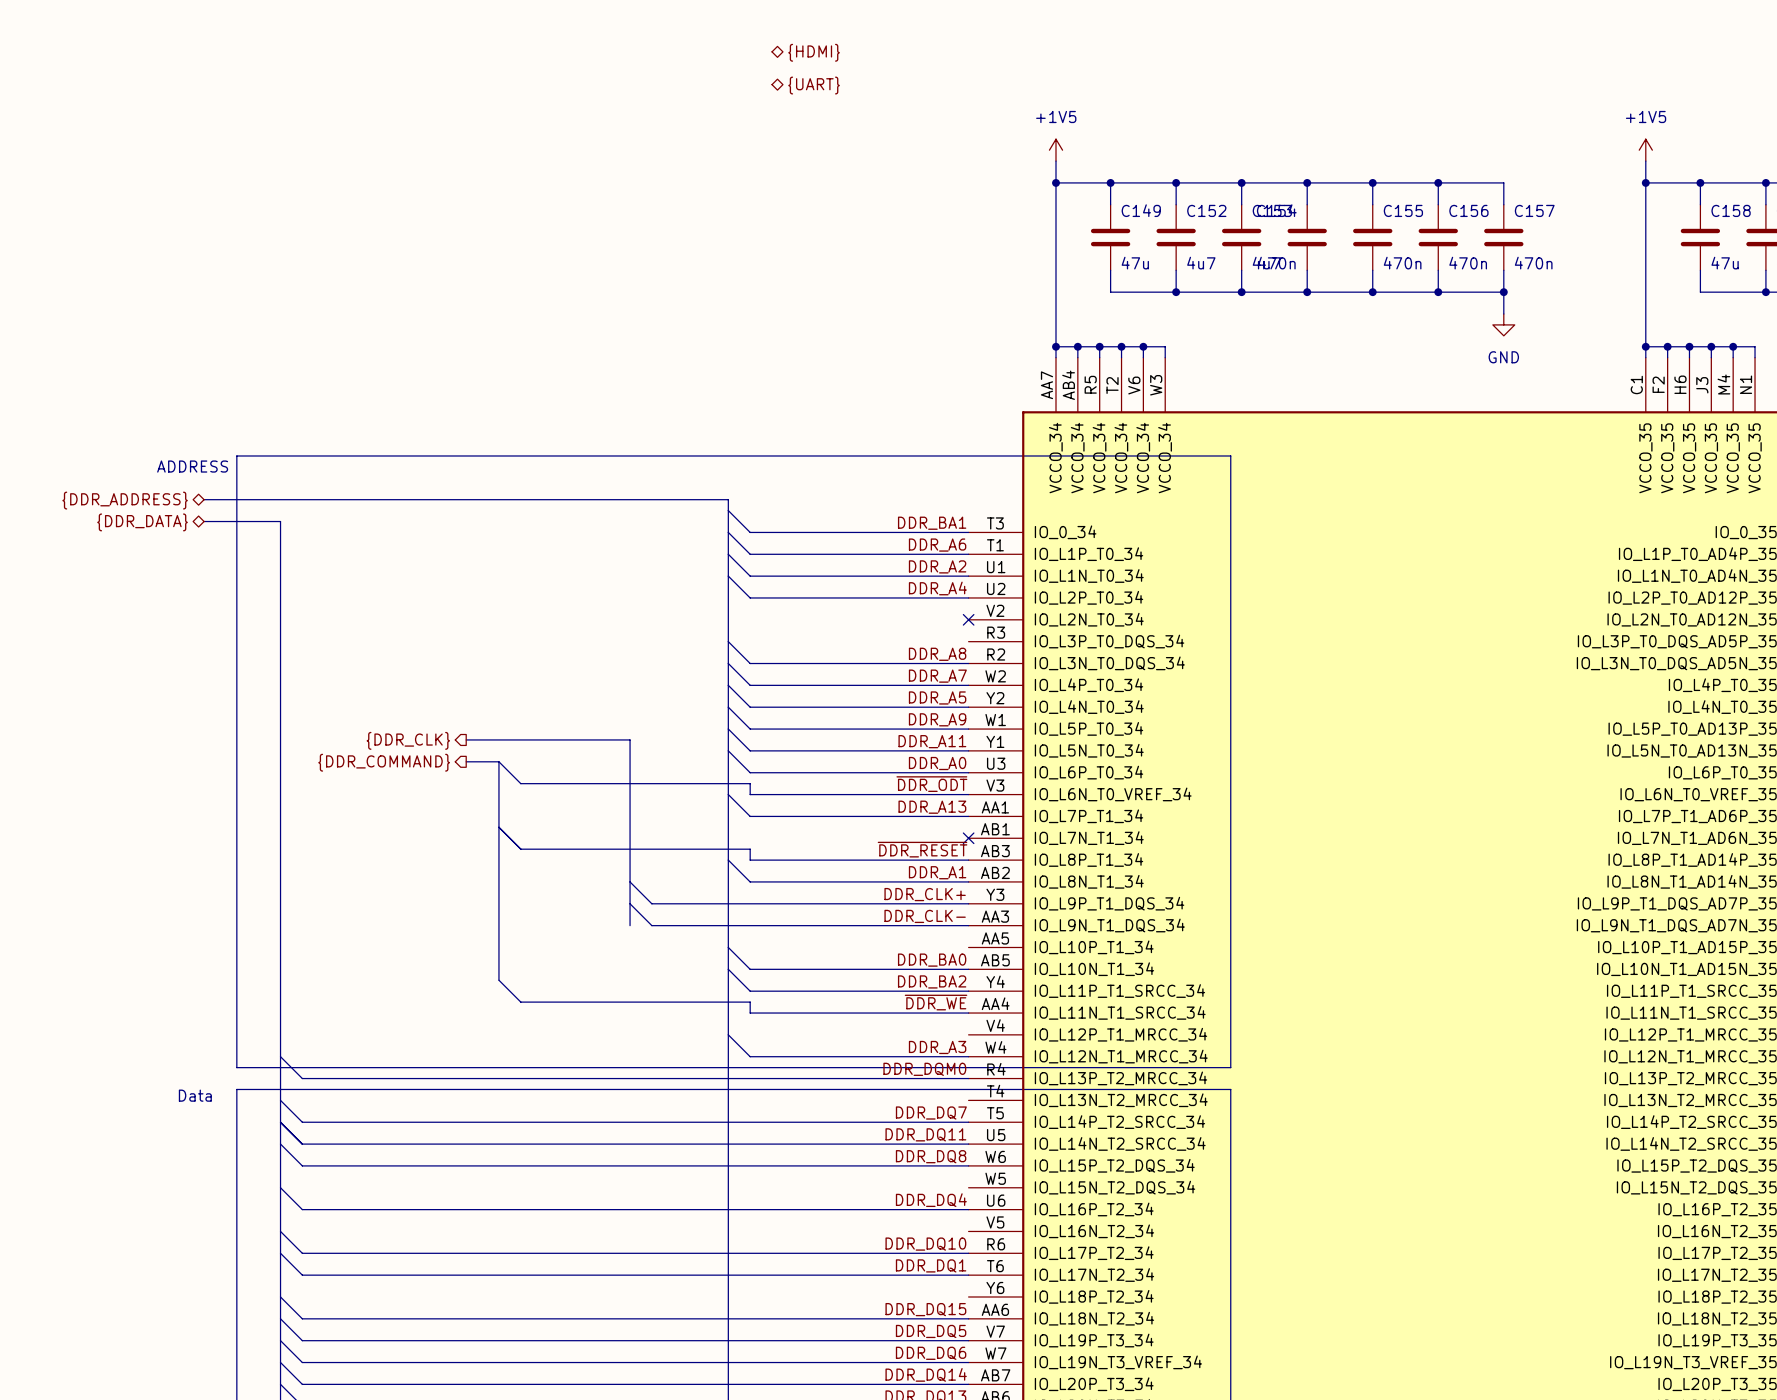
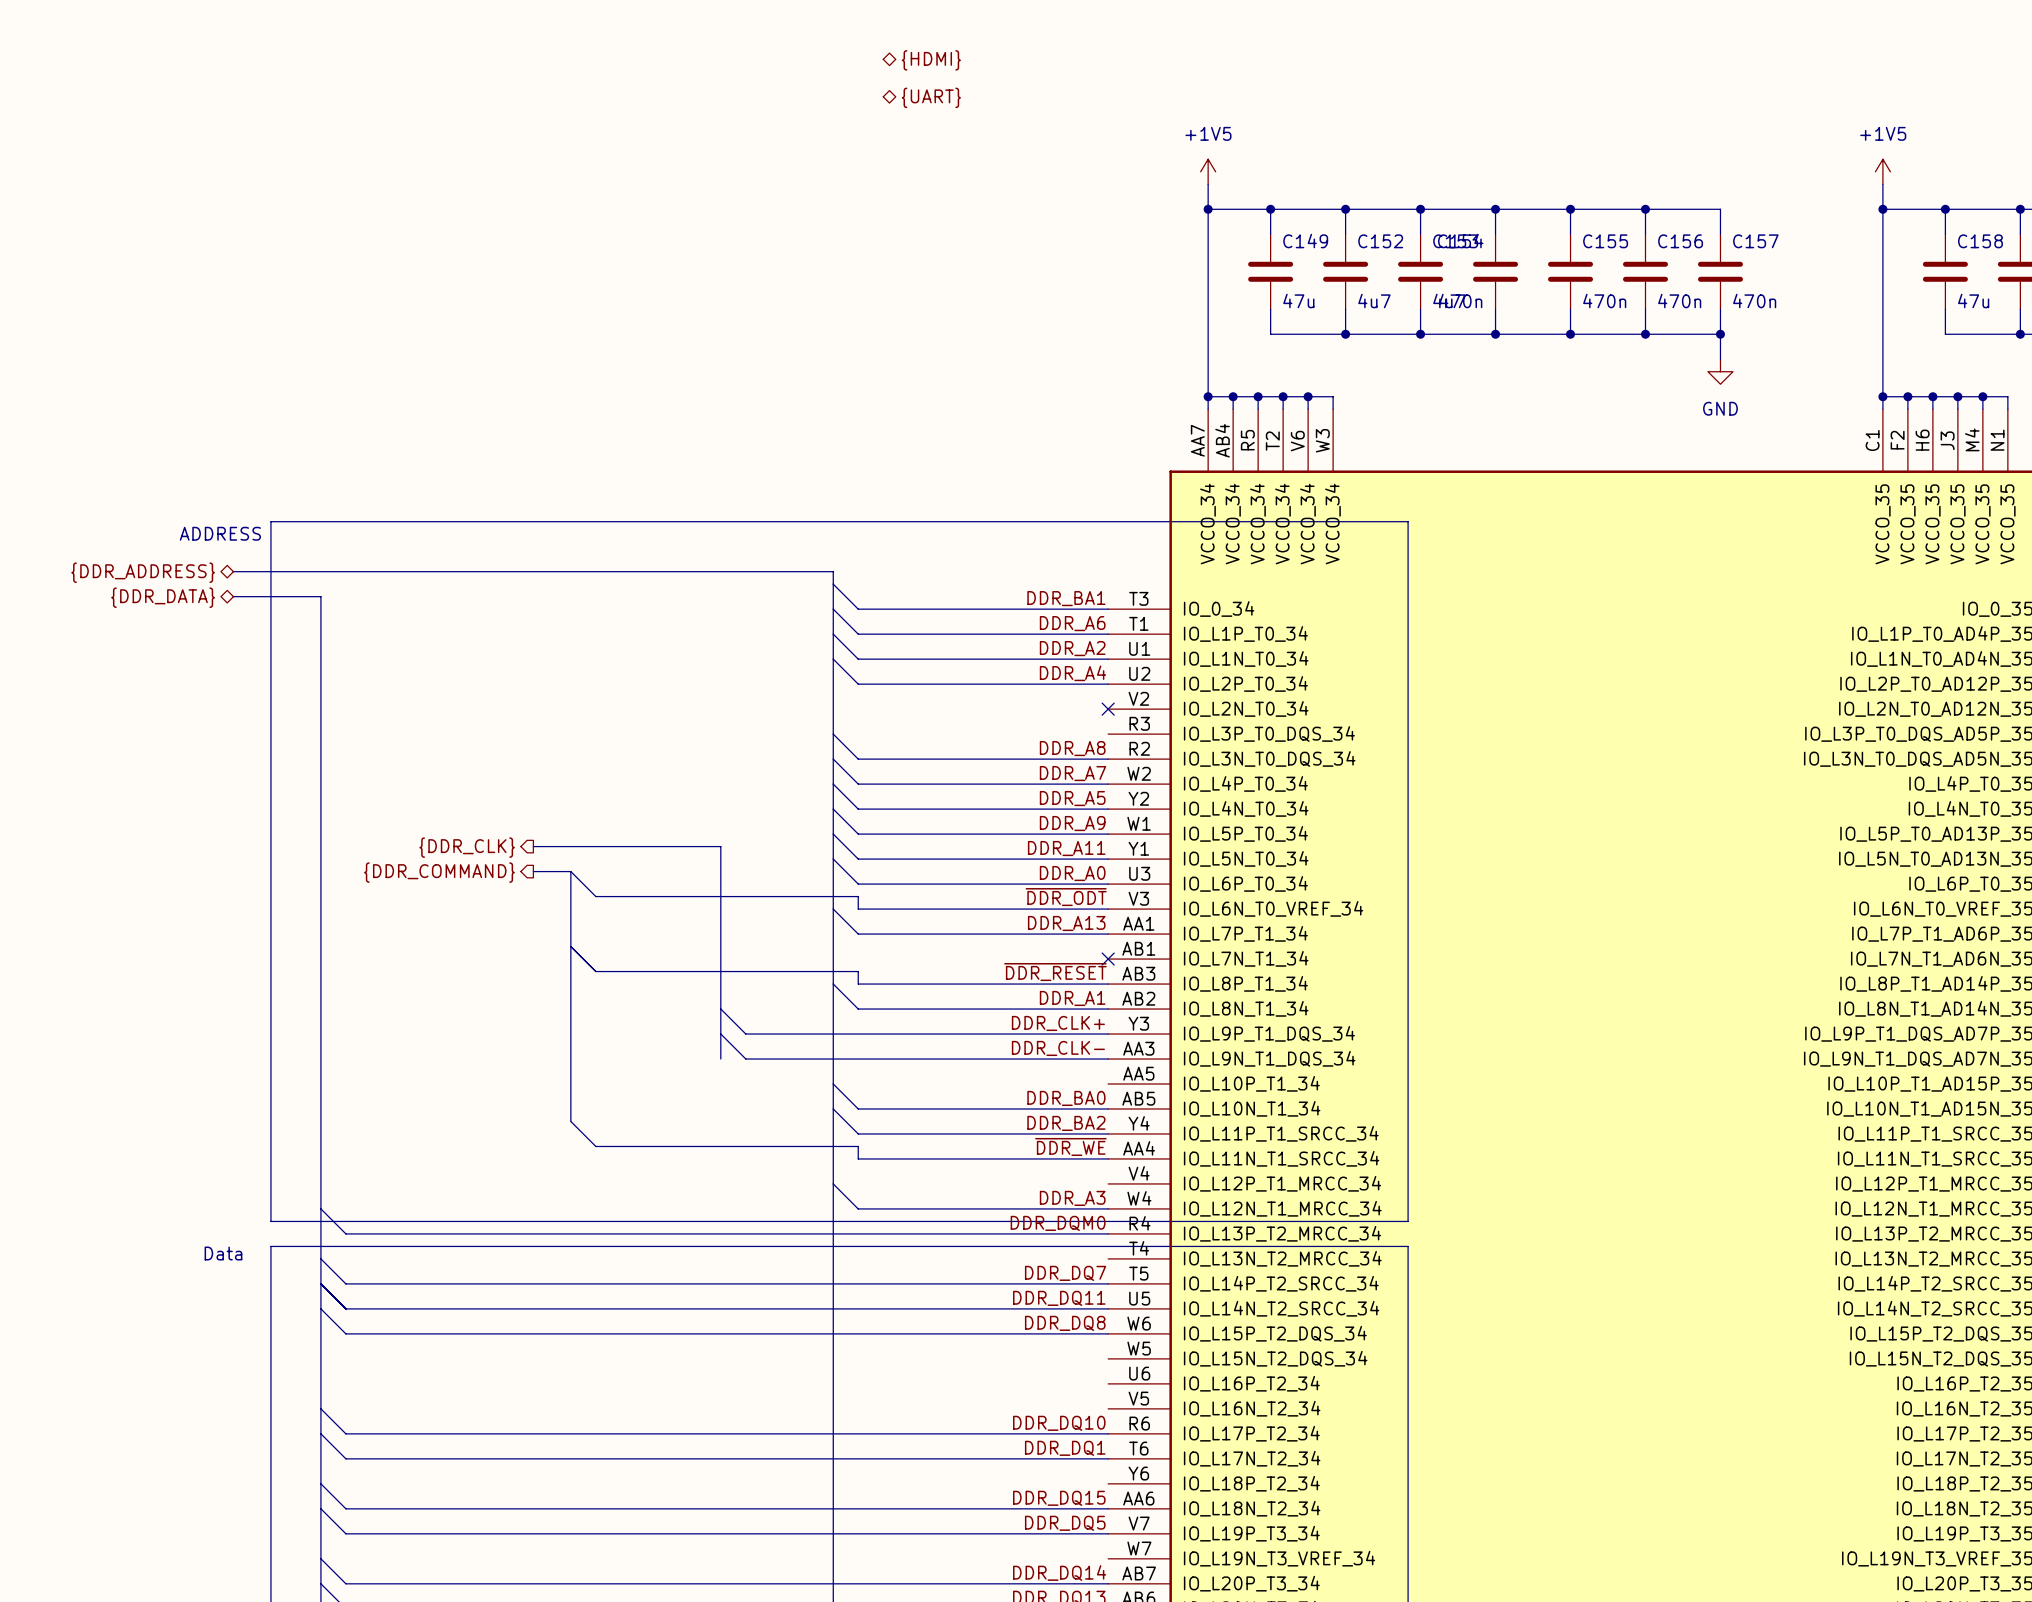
wire: (280, 1187) (302, 1209) (968, 1209) -> none
label: DDR_DQ4 (931, 1200) -> none
wire: (280, 1340) (302, 1362) (968, 1362) -> none
label: DDR_DQ6 (931, 1353) -> none

